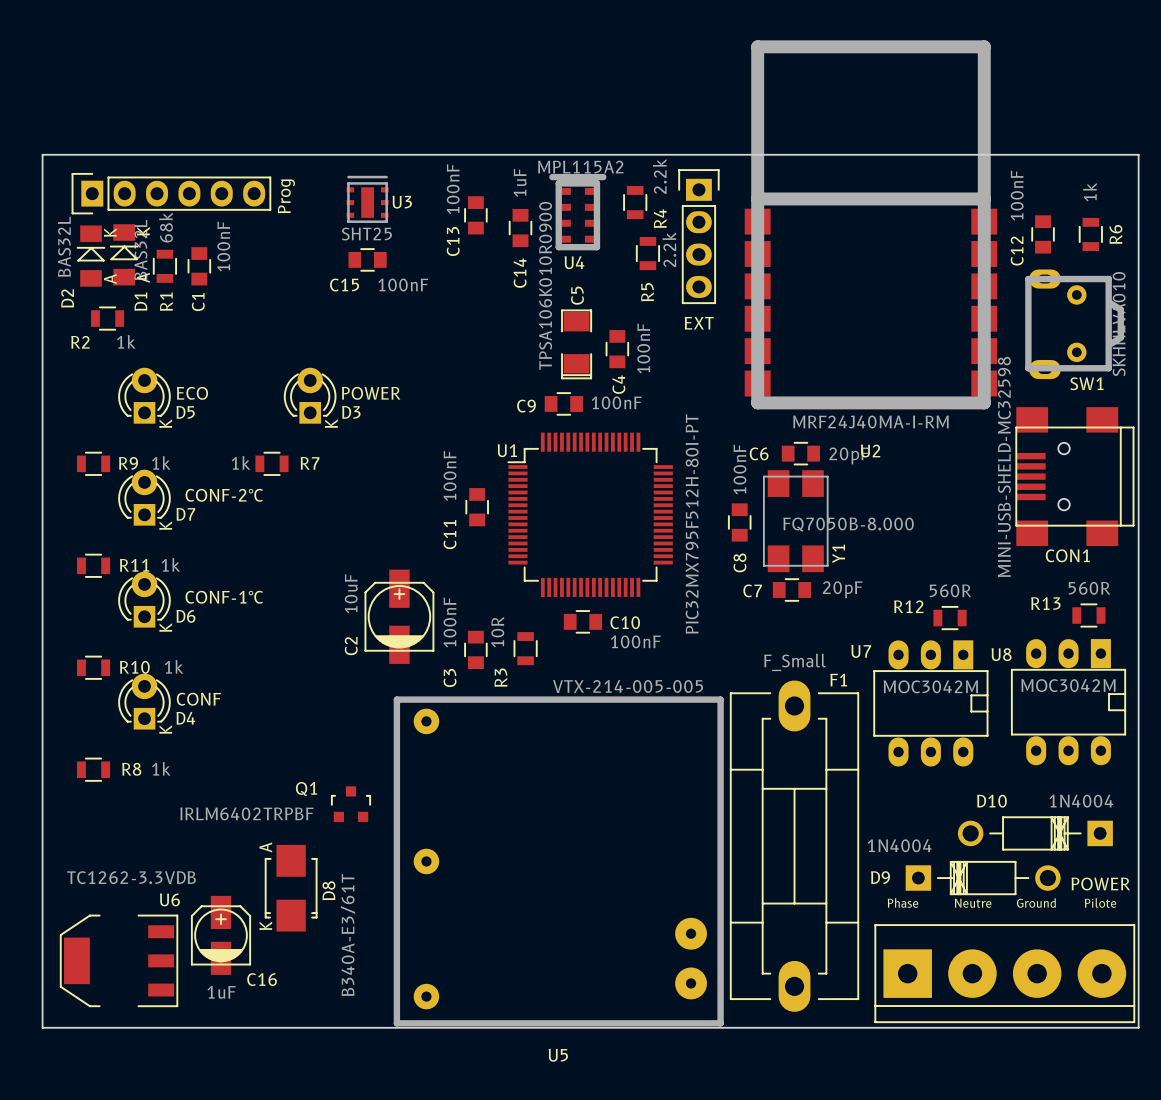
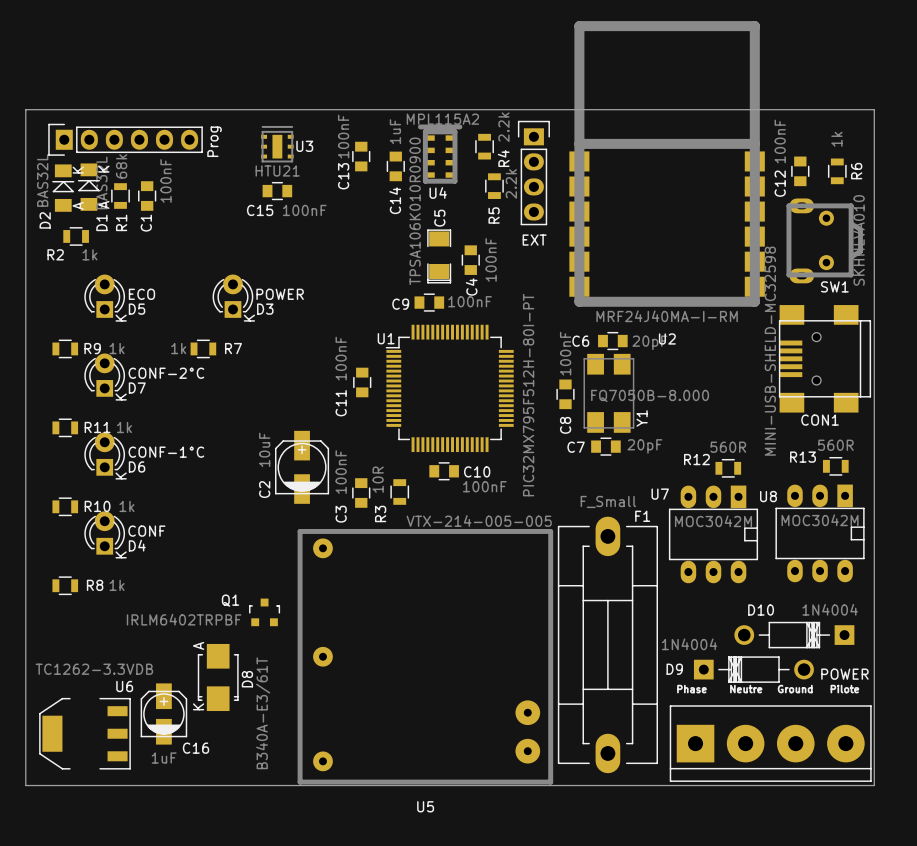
U3 value: SHT25 (366, 234) -> HTU21 (277, 170)

